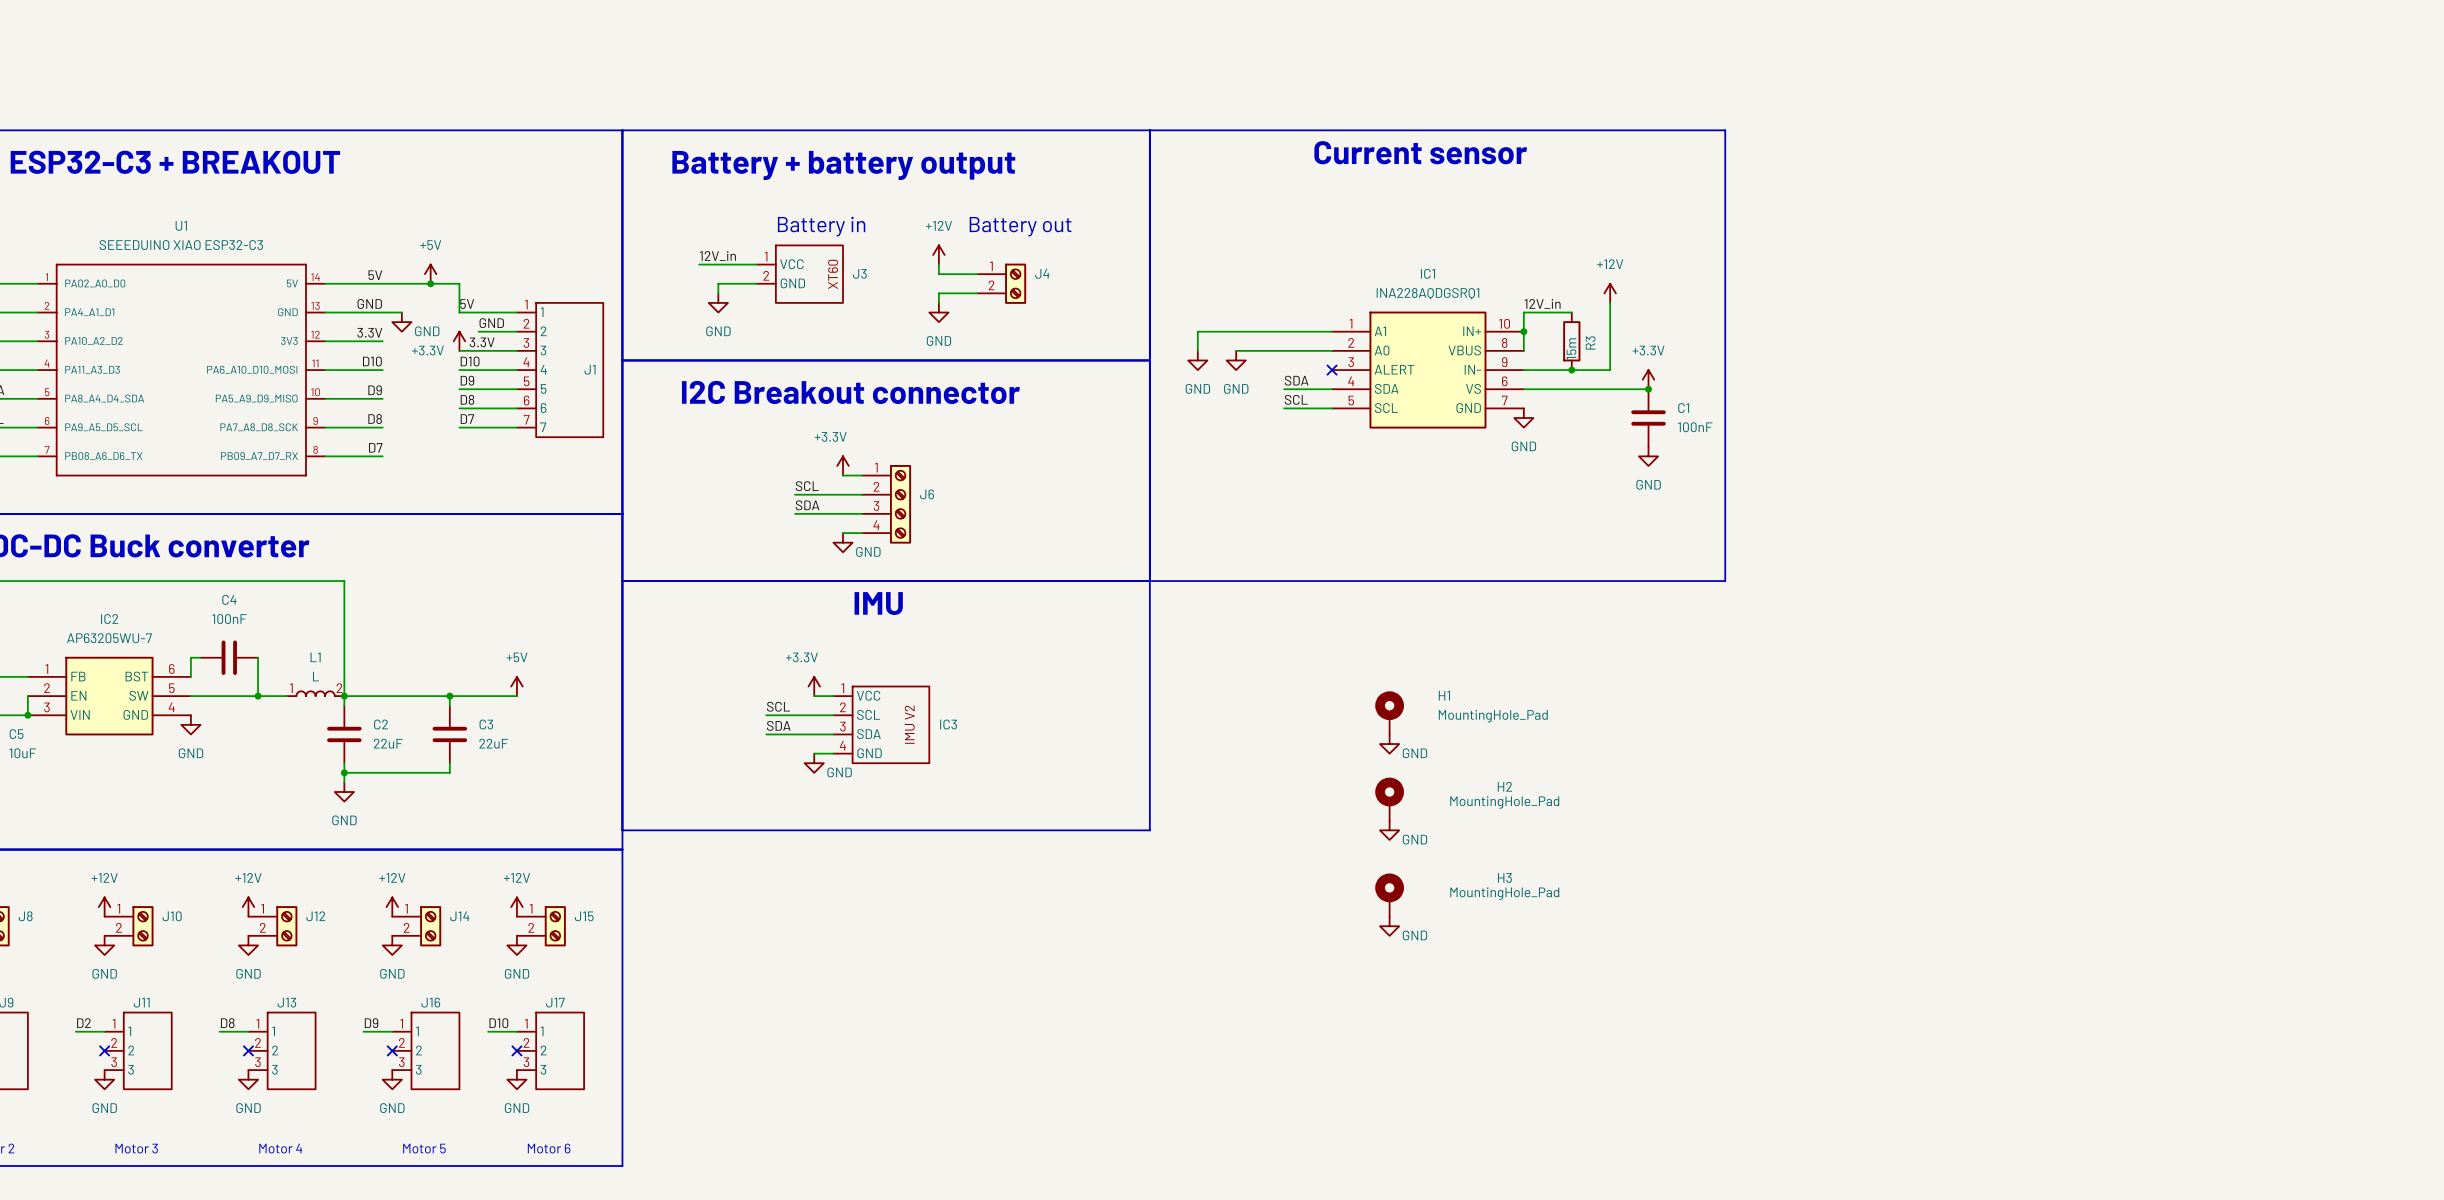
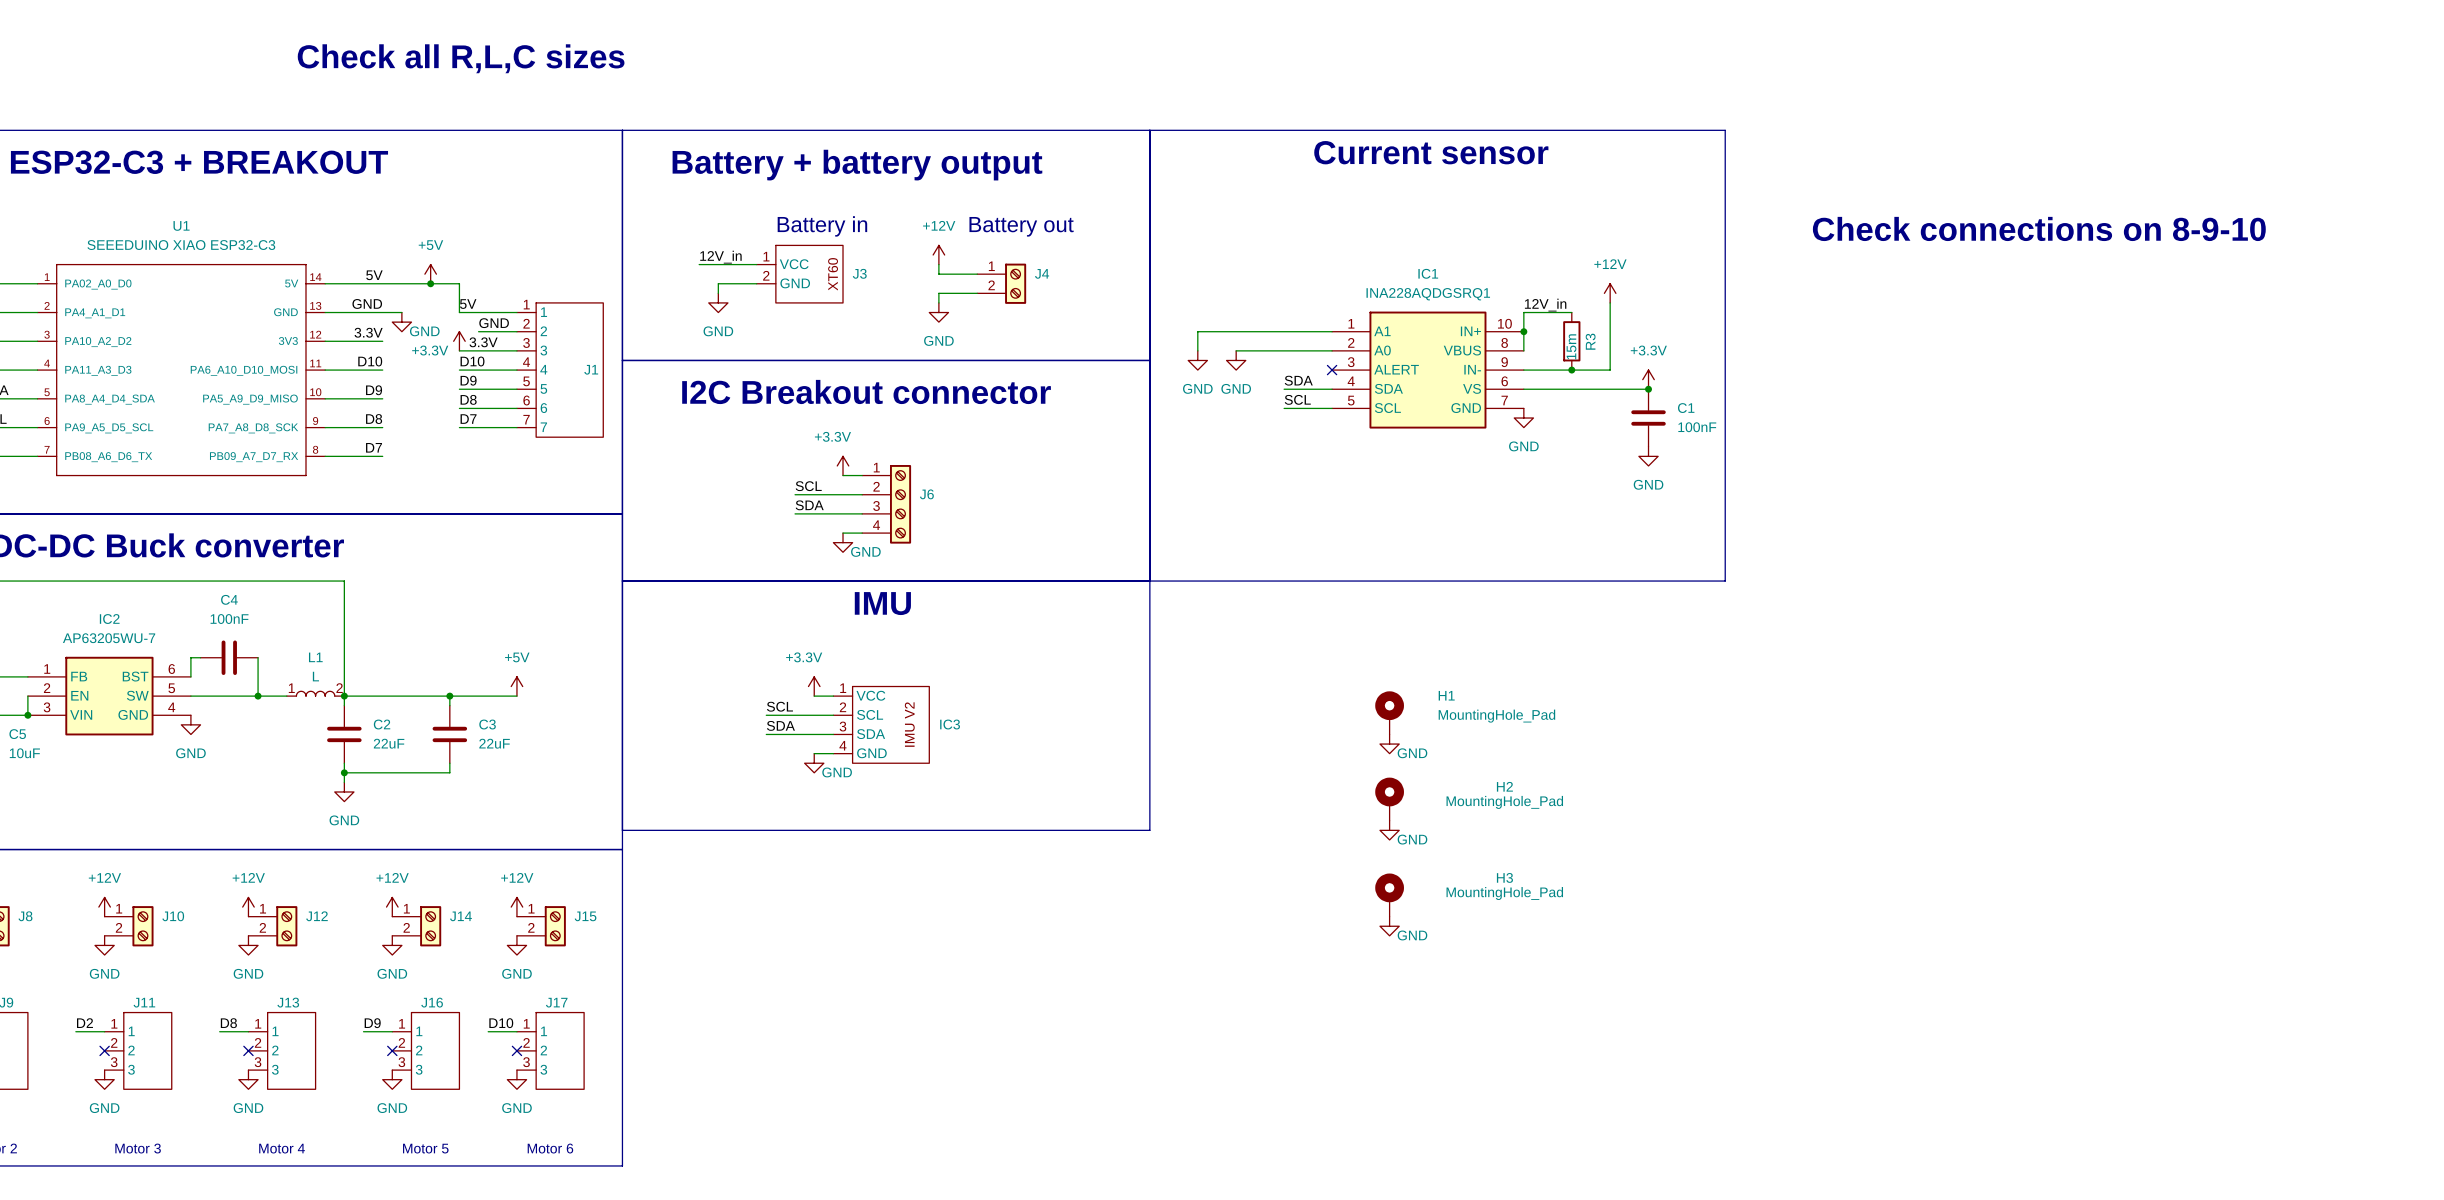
text: none -> Check all R,L,C sizes (461, 58)
text: none -> Check connections on 8-9-10 (2039, 228)

